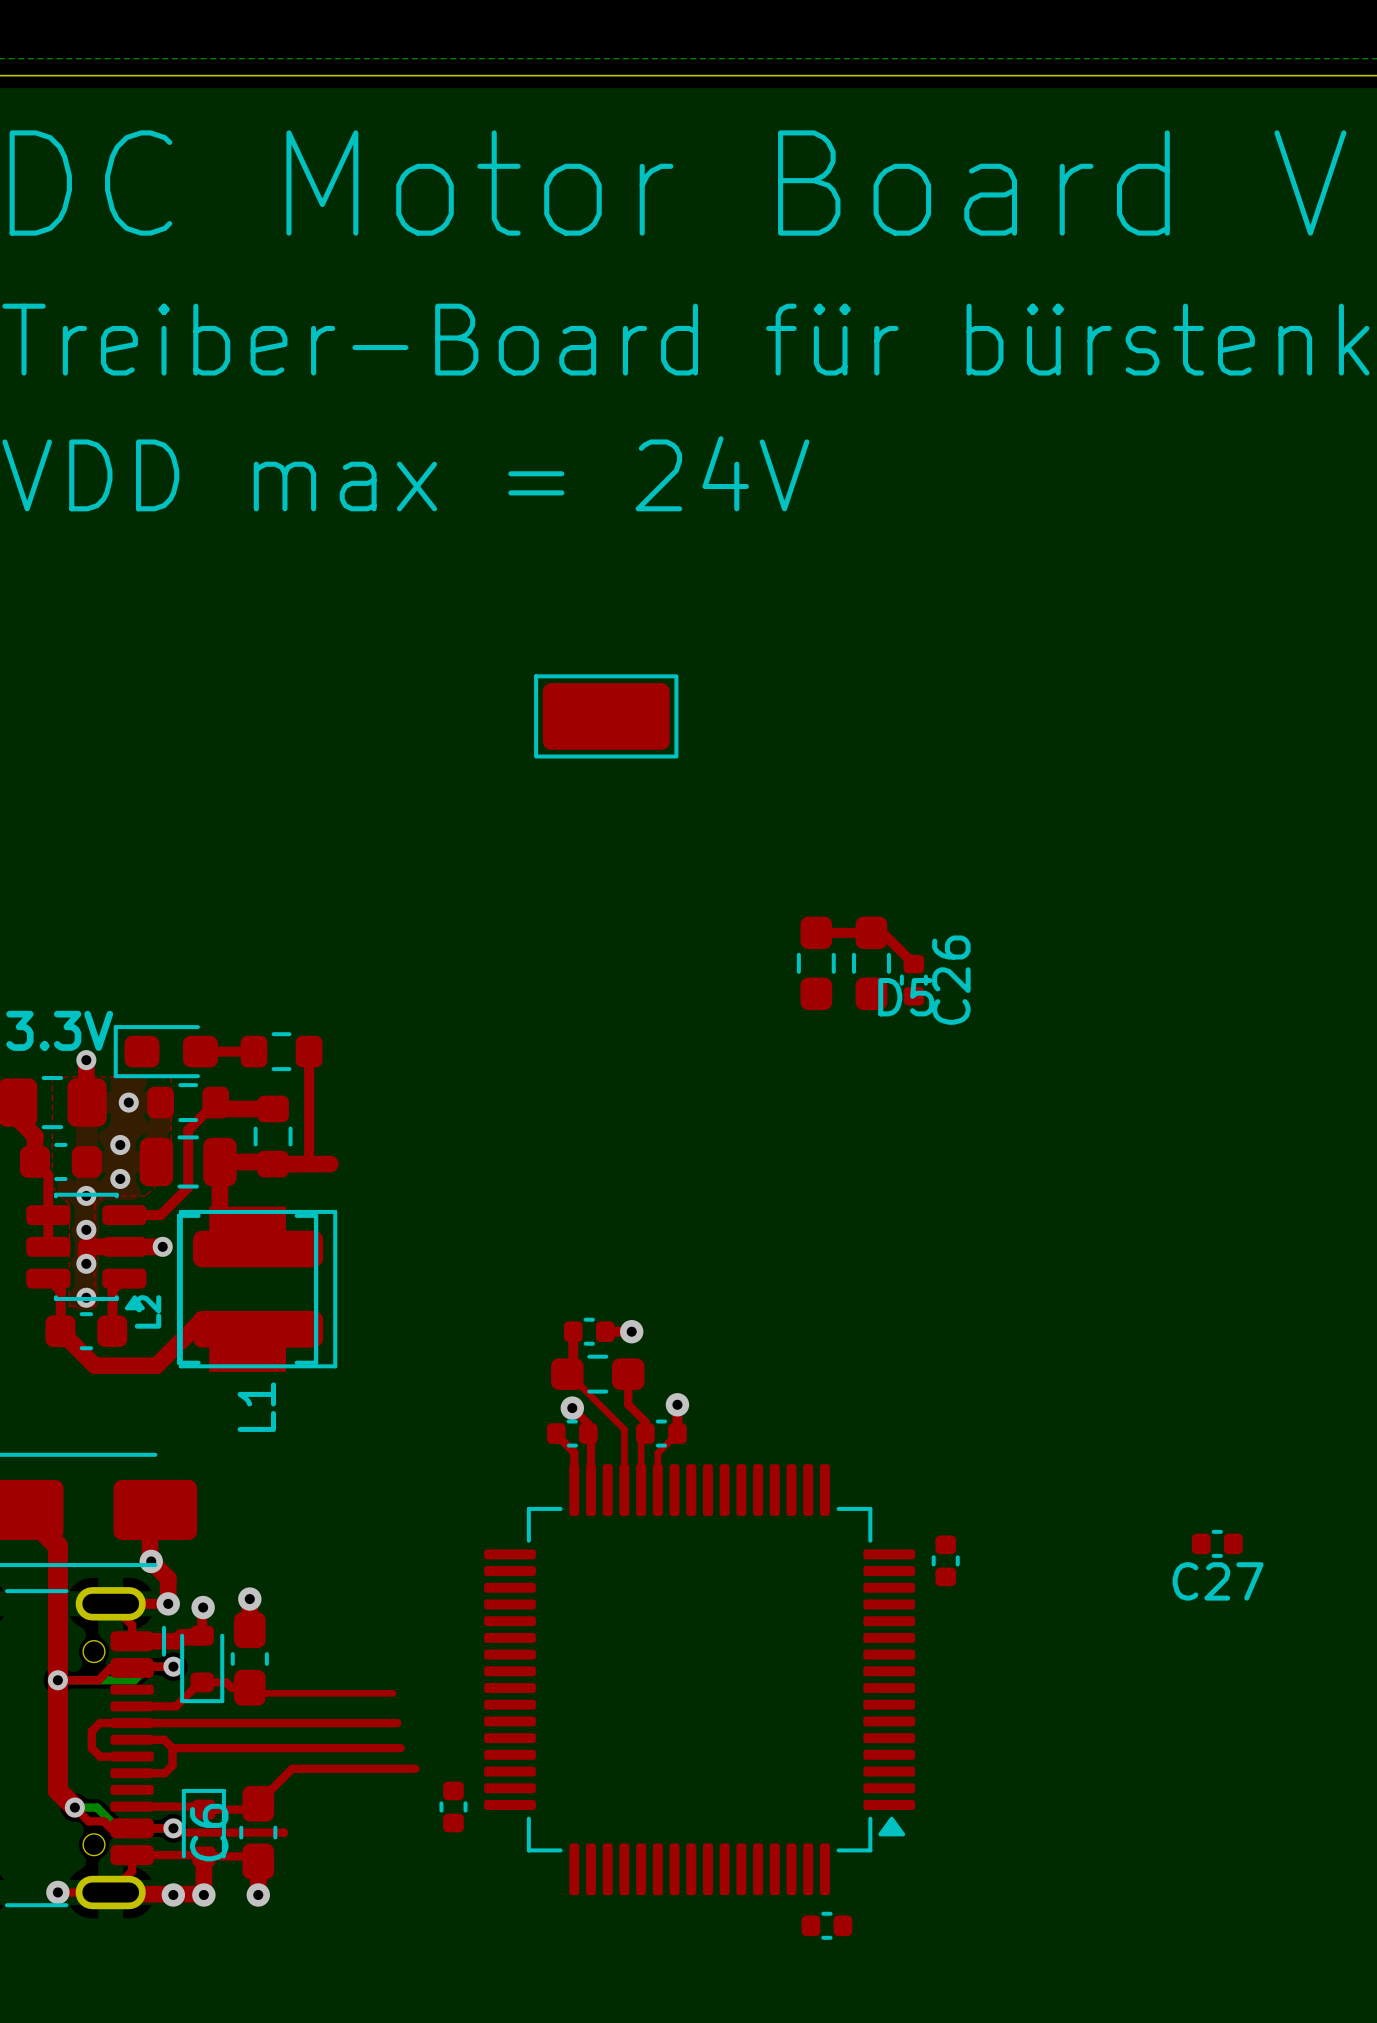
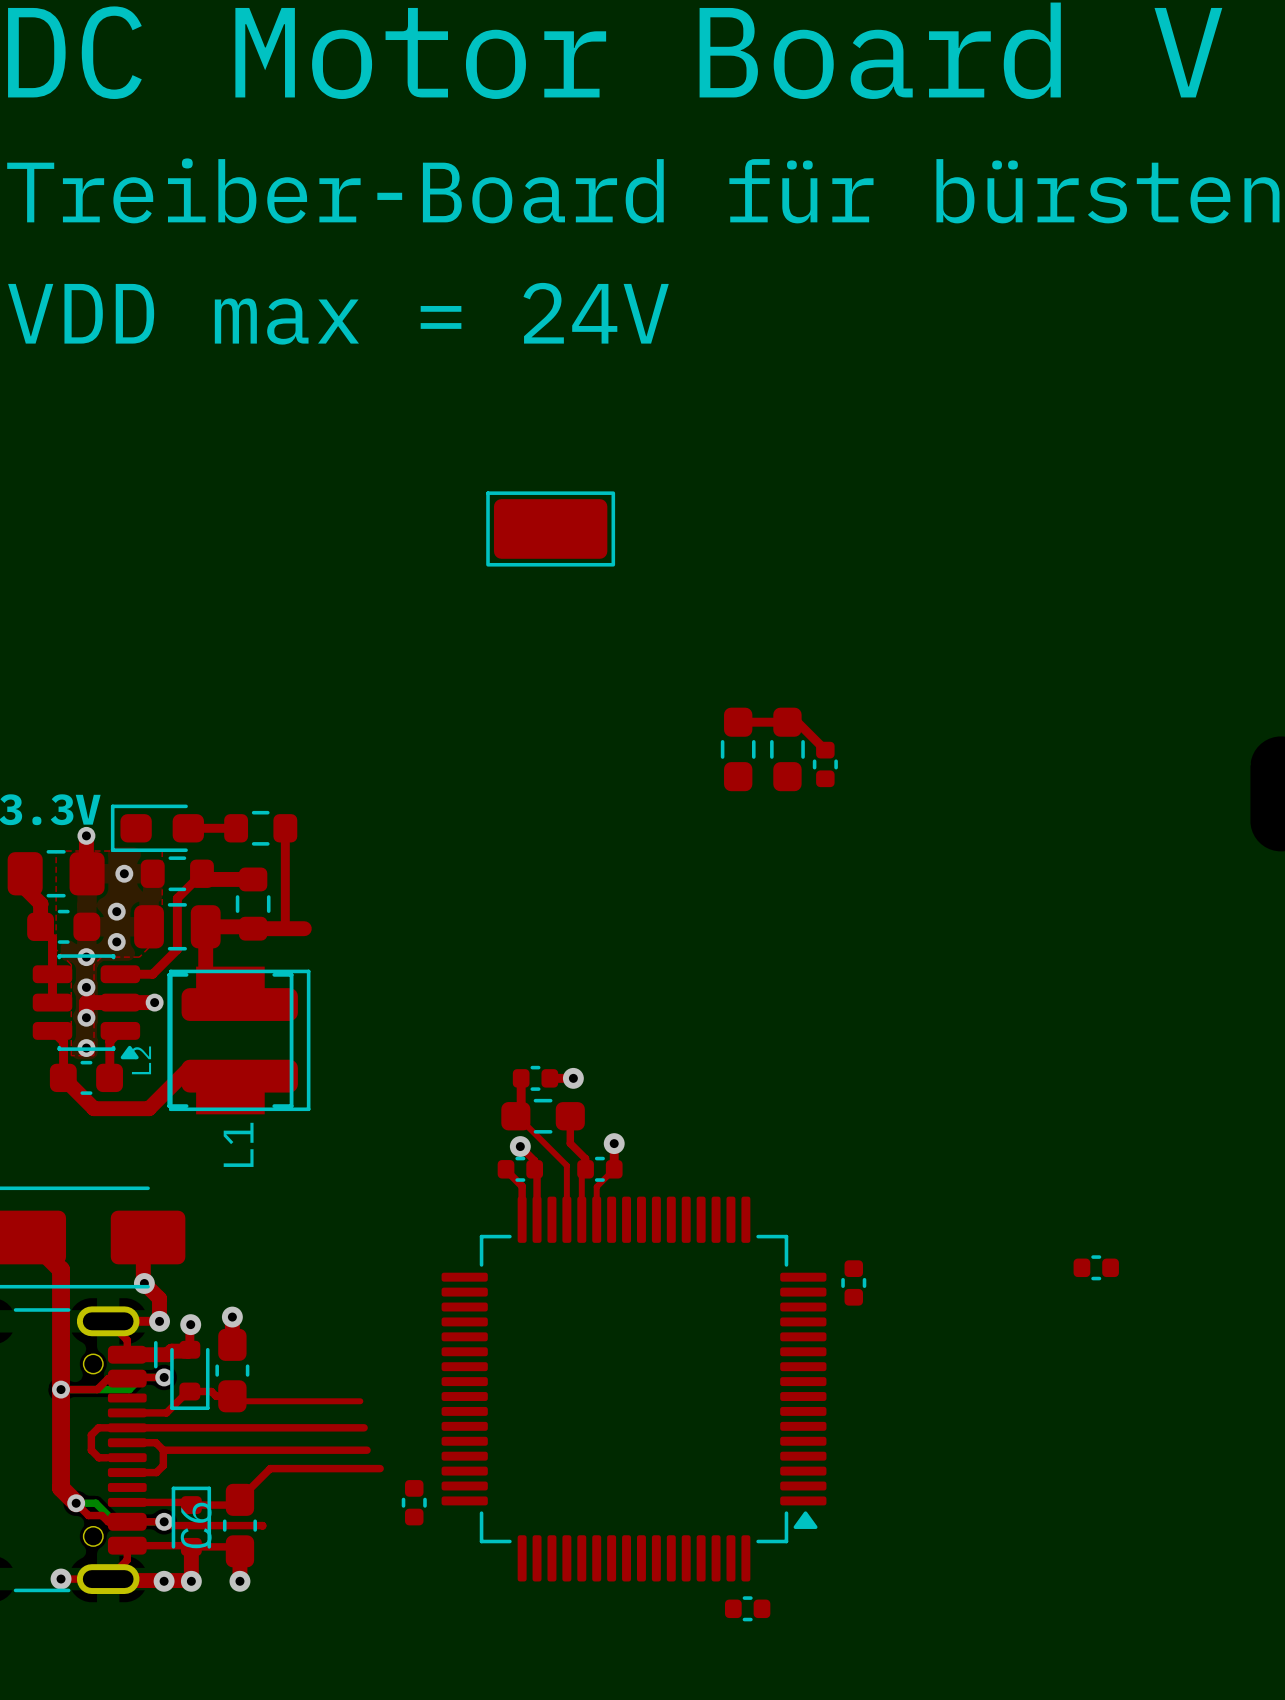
C26 name: C26 (951, 980) -> none
D5 name: D5 (906, 997) -> none
C27 name: C27 (1218, 1581) -> none

